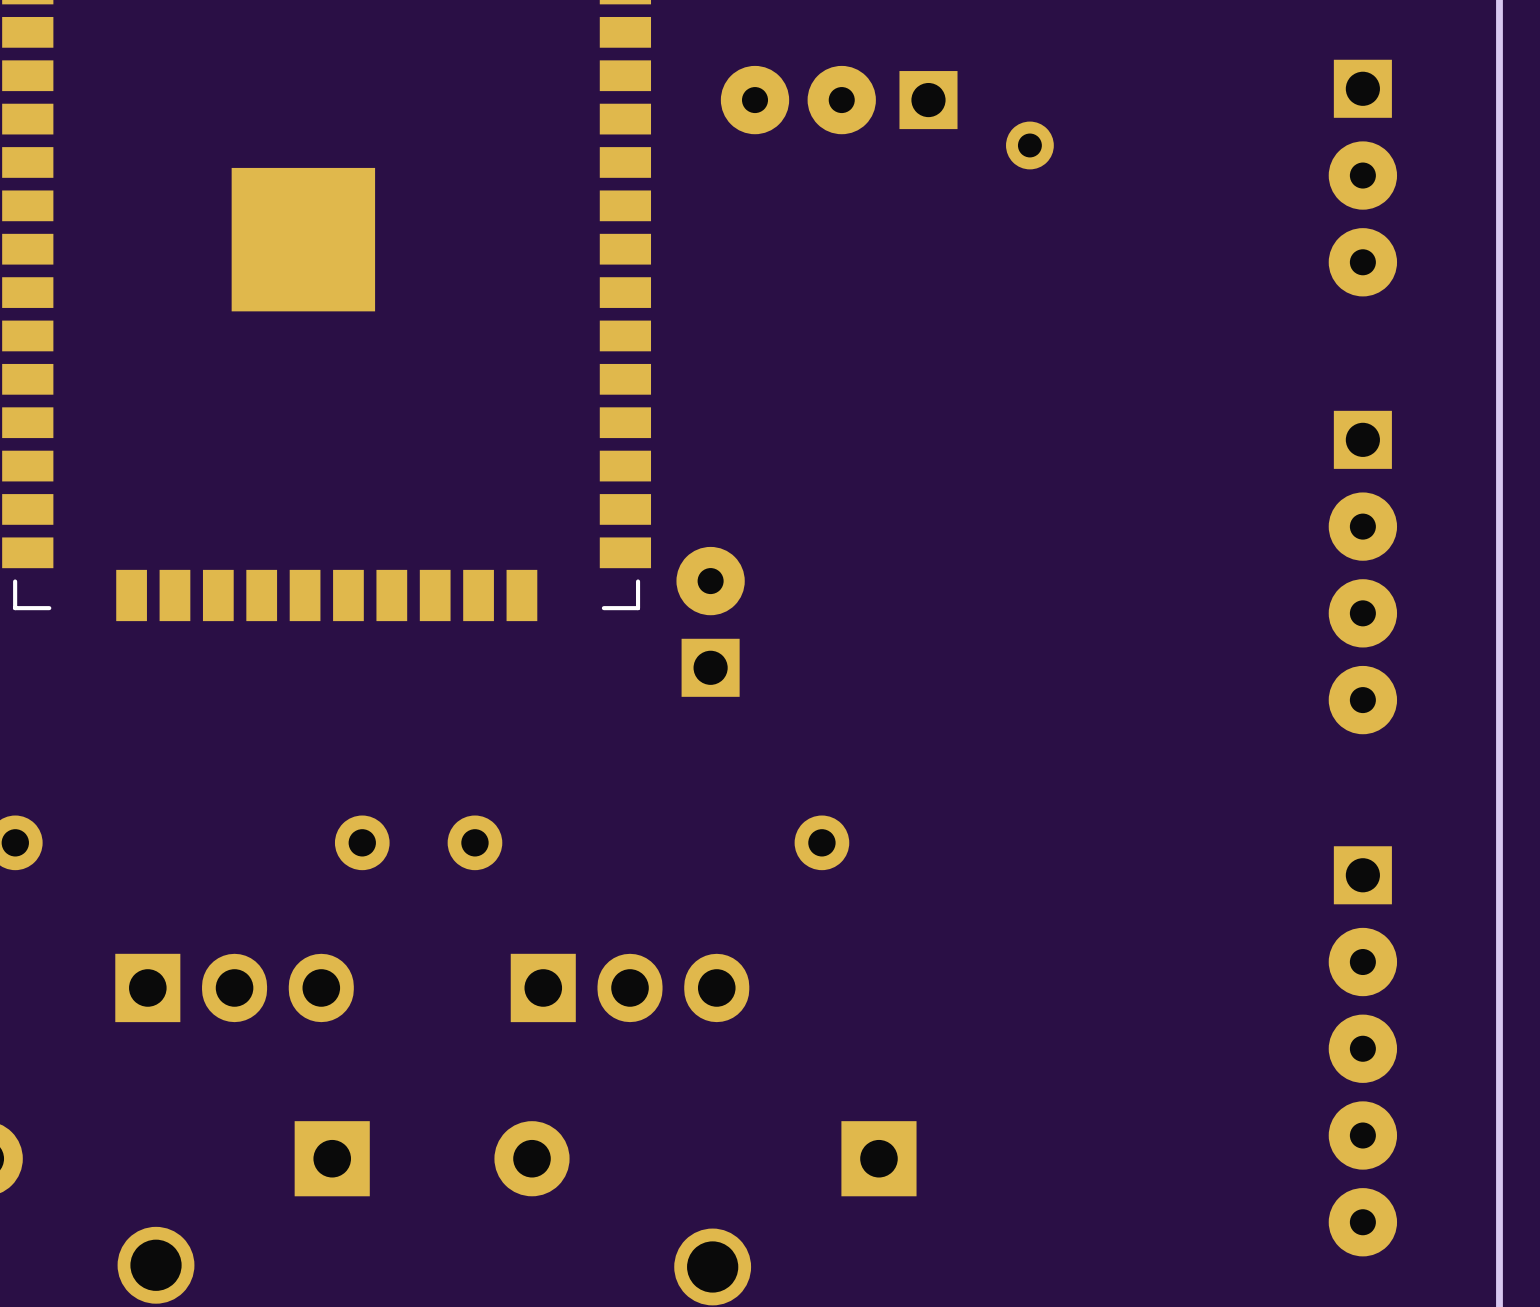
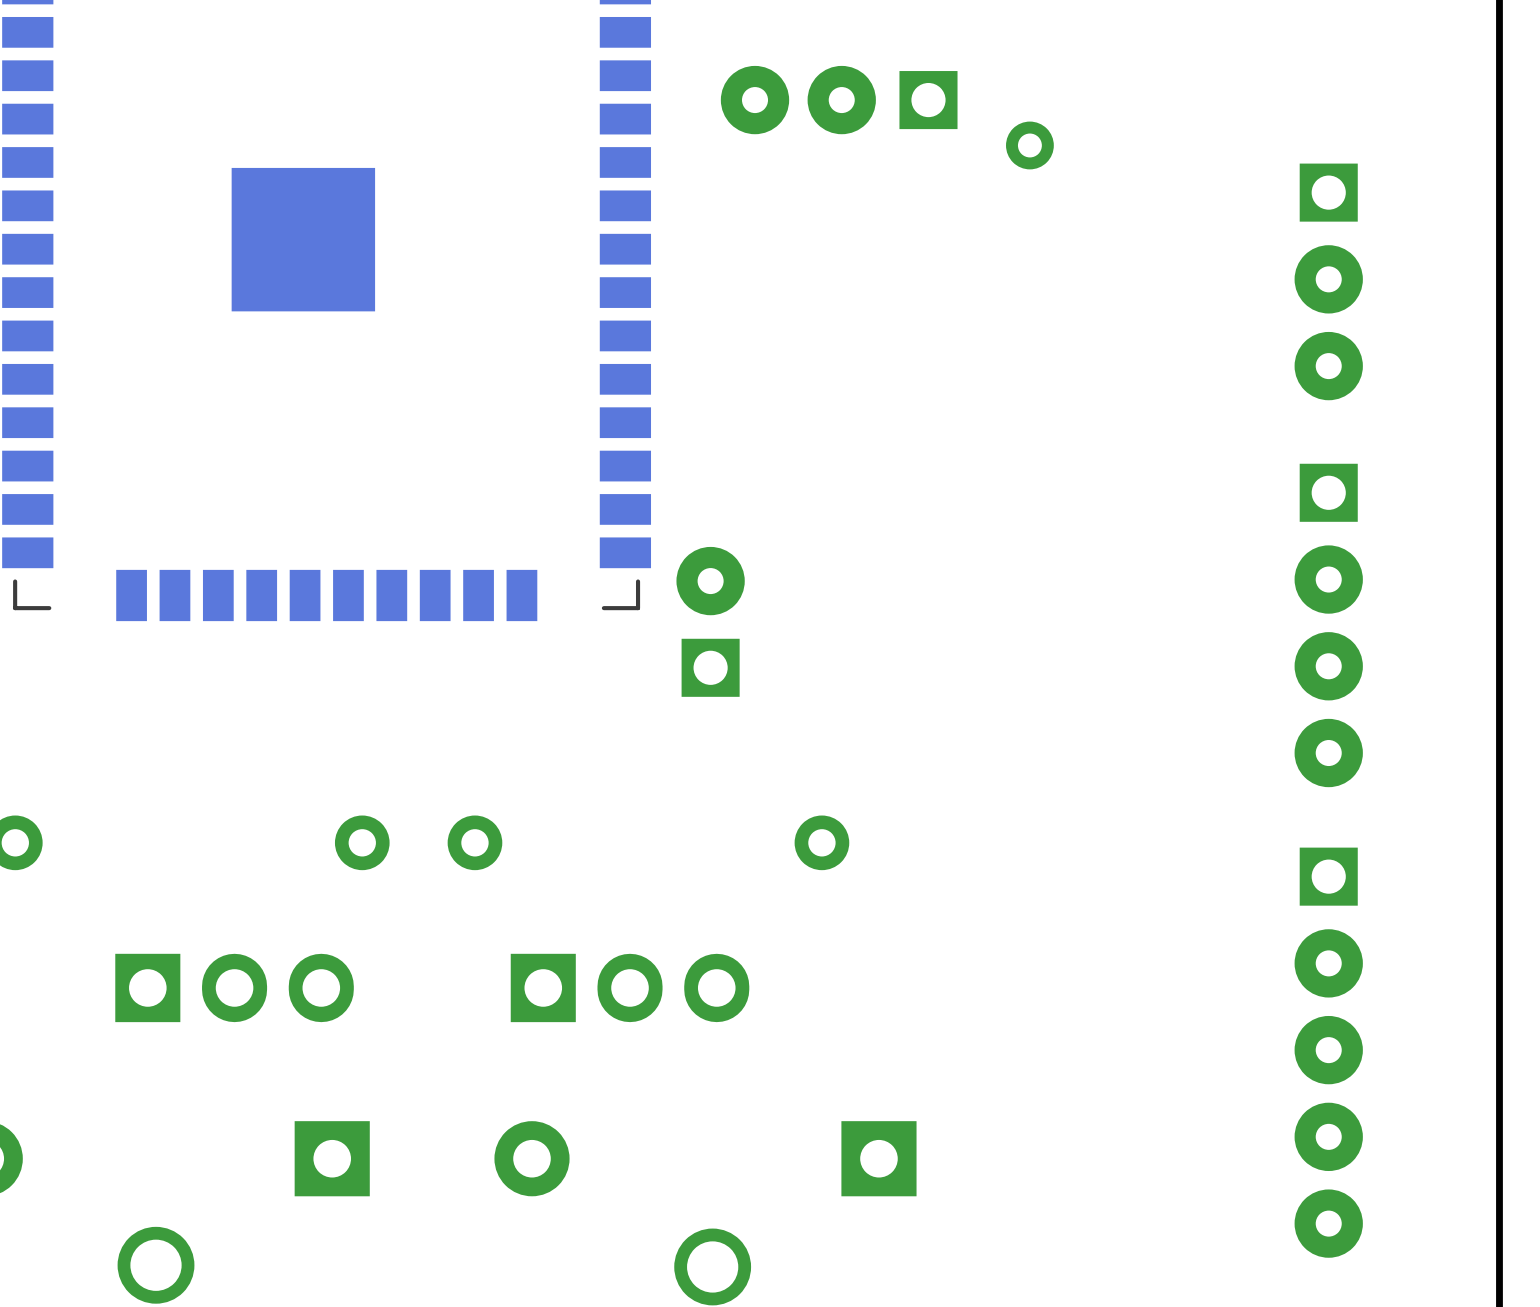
part position: (1362, 178) -> (1328, 281)
part position: (1362, 572) -> (1328, 625)
part position: (1362, 1051) -> (1328, 1052)

